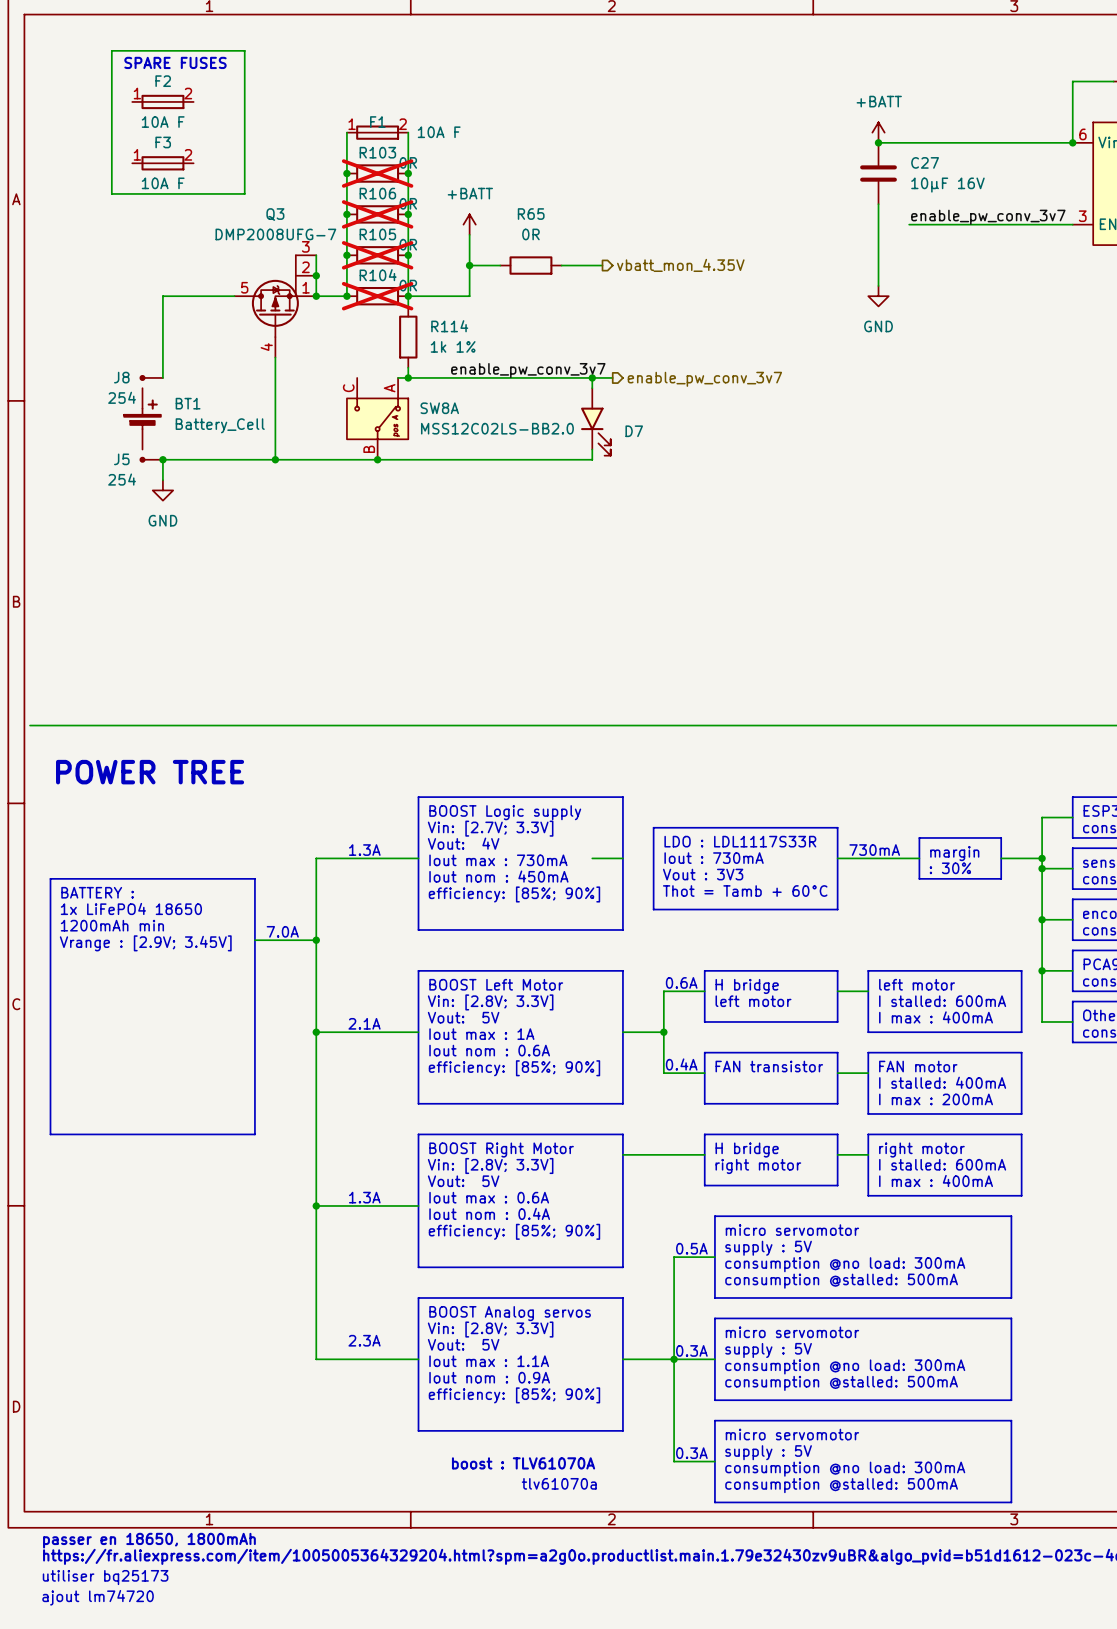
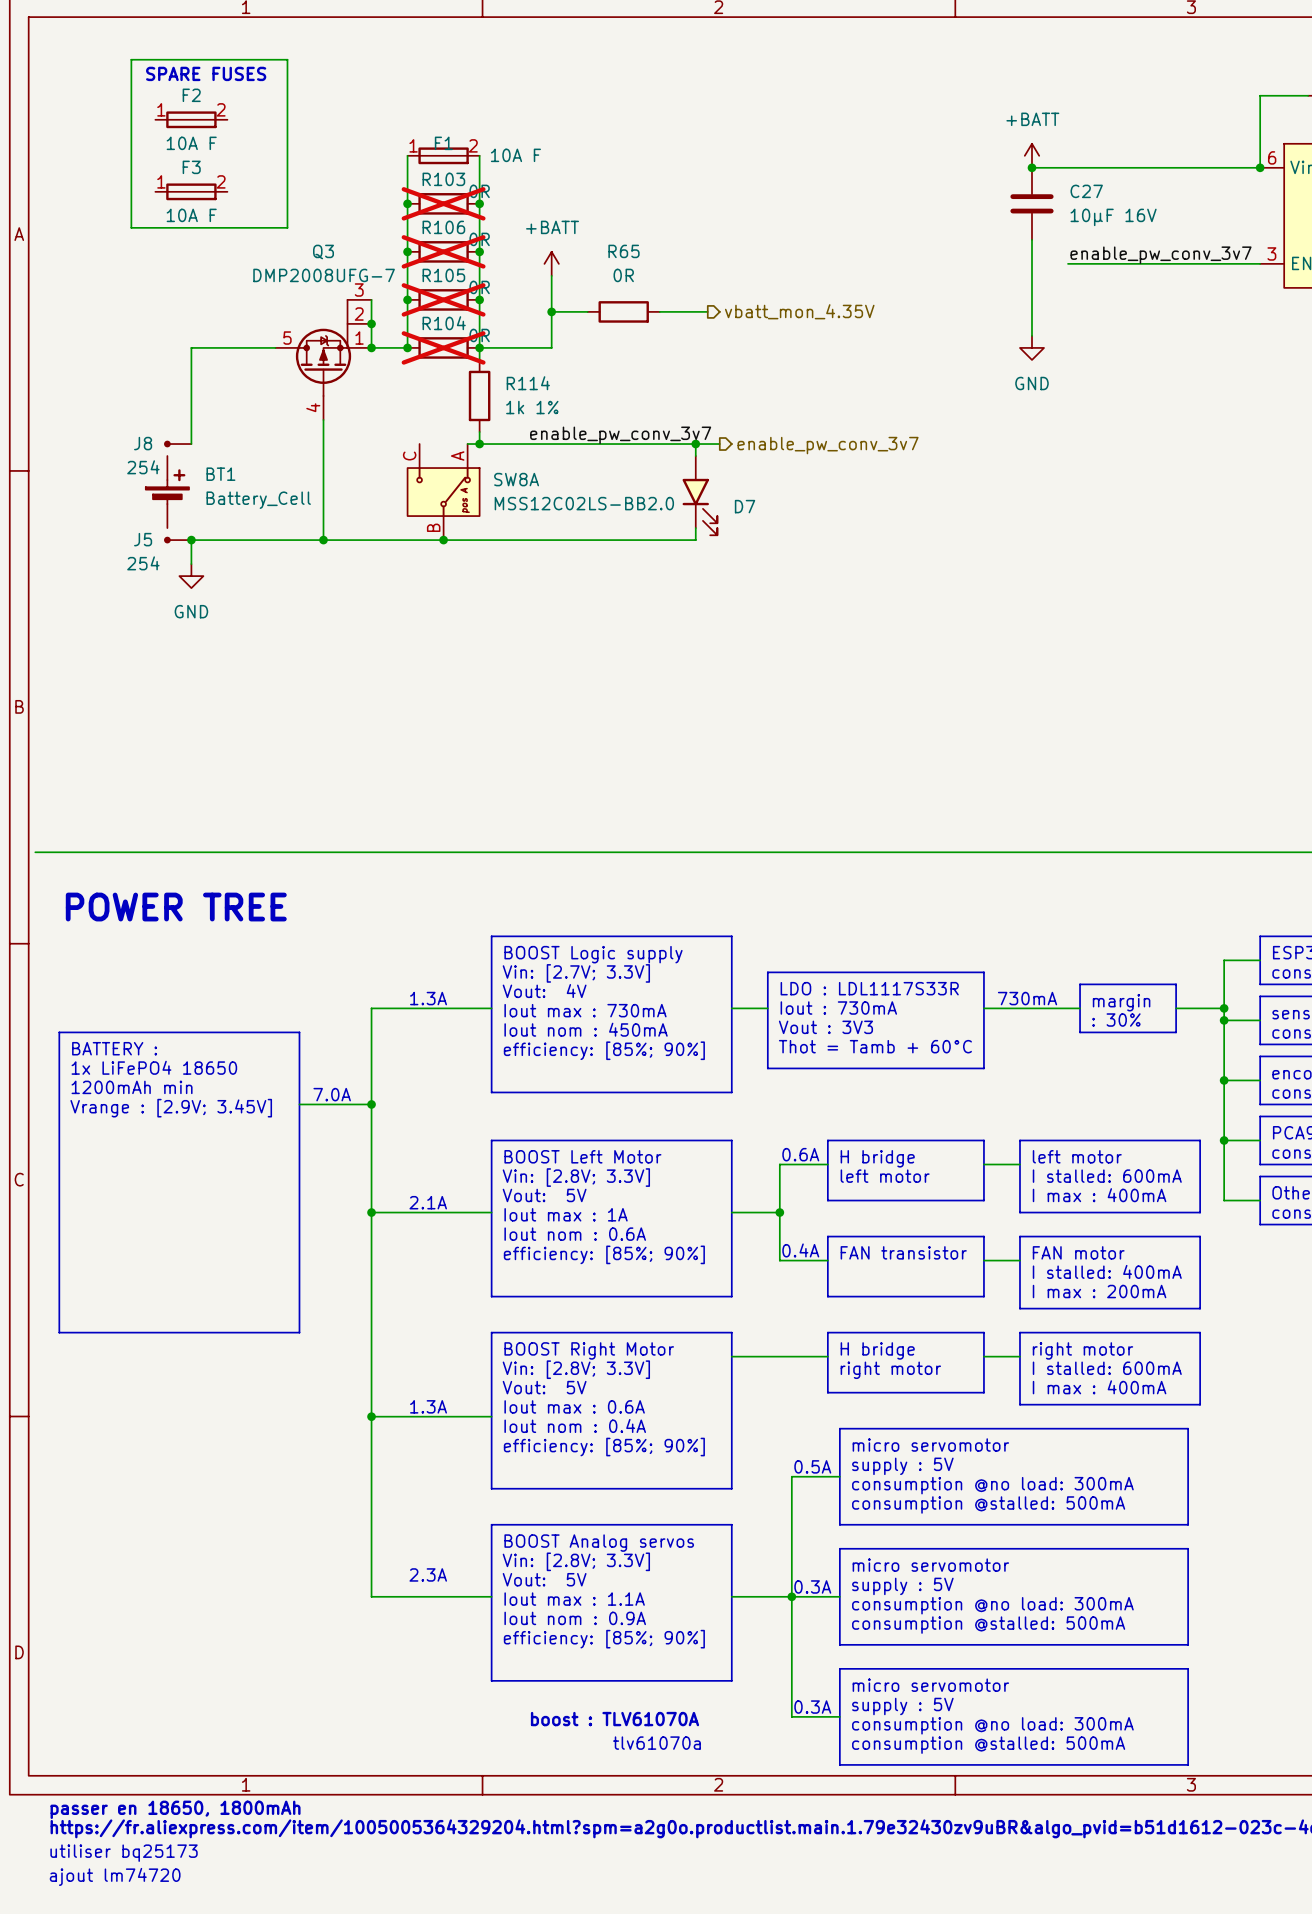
wire: (592, 858) (622, 858) -> (767, 1008) (731, 1008)

